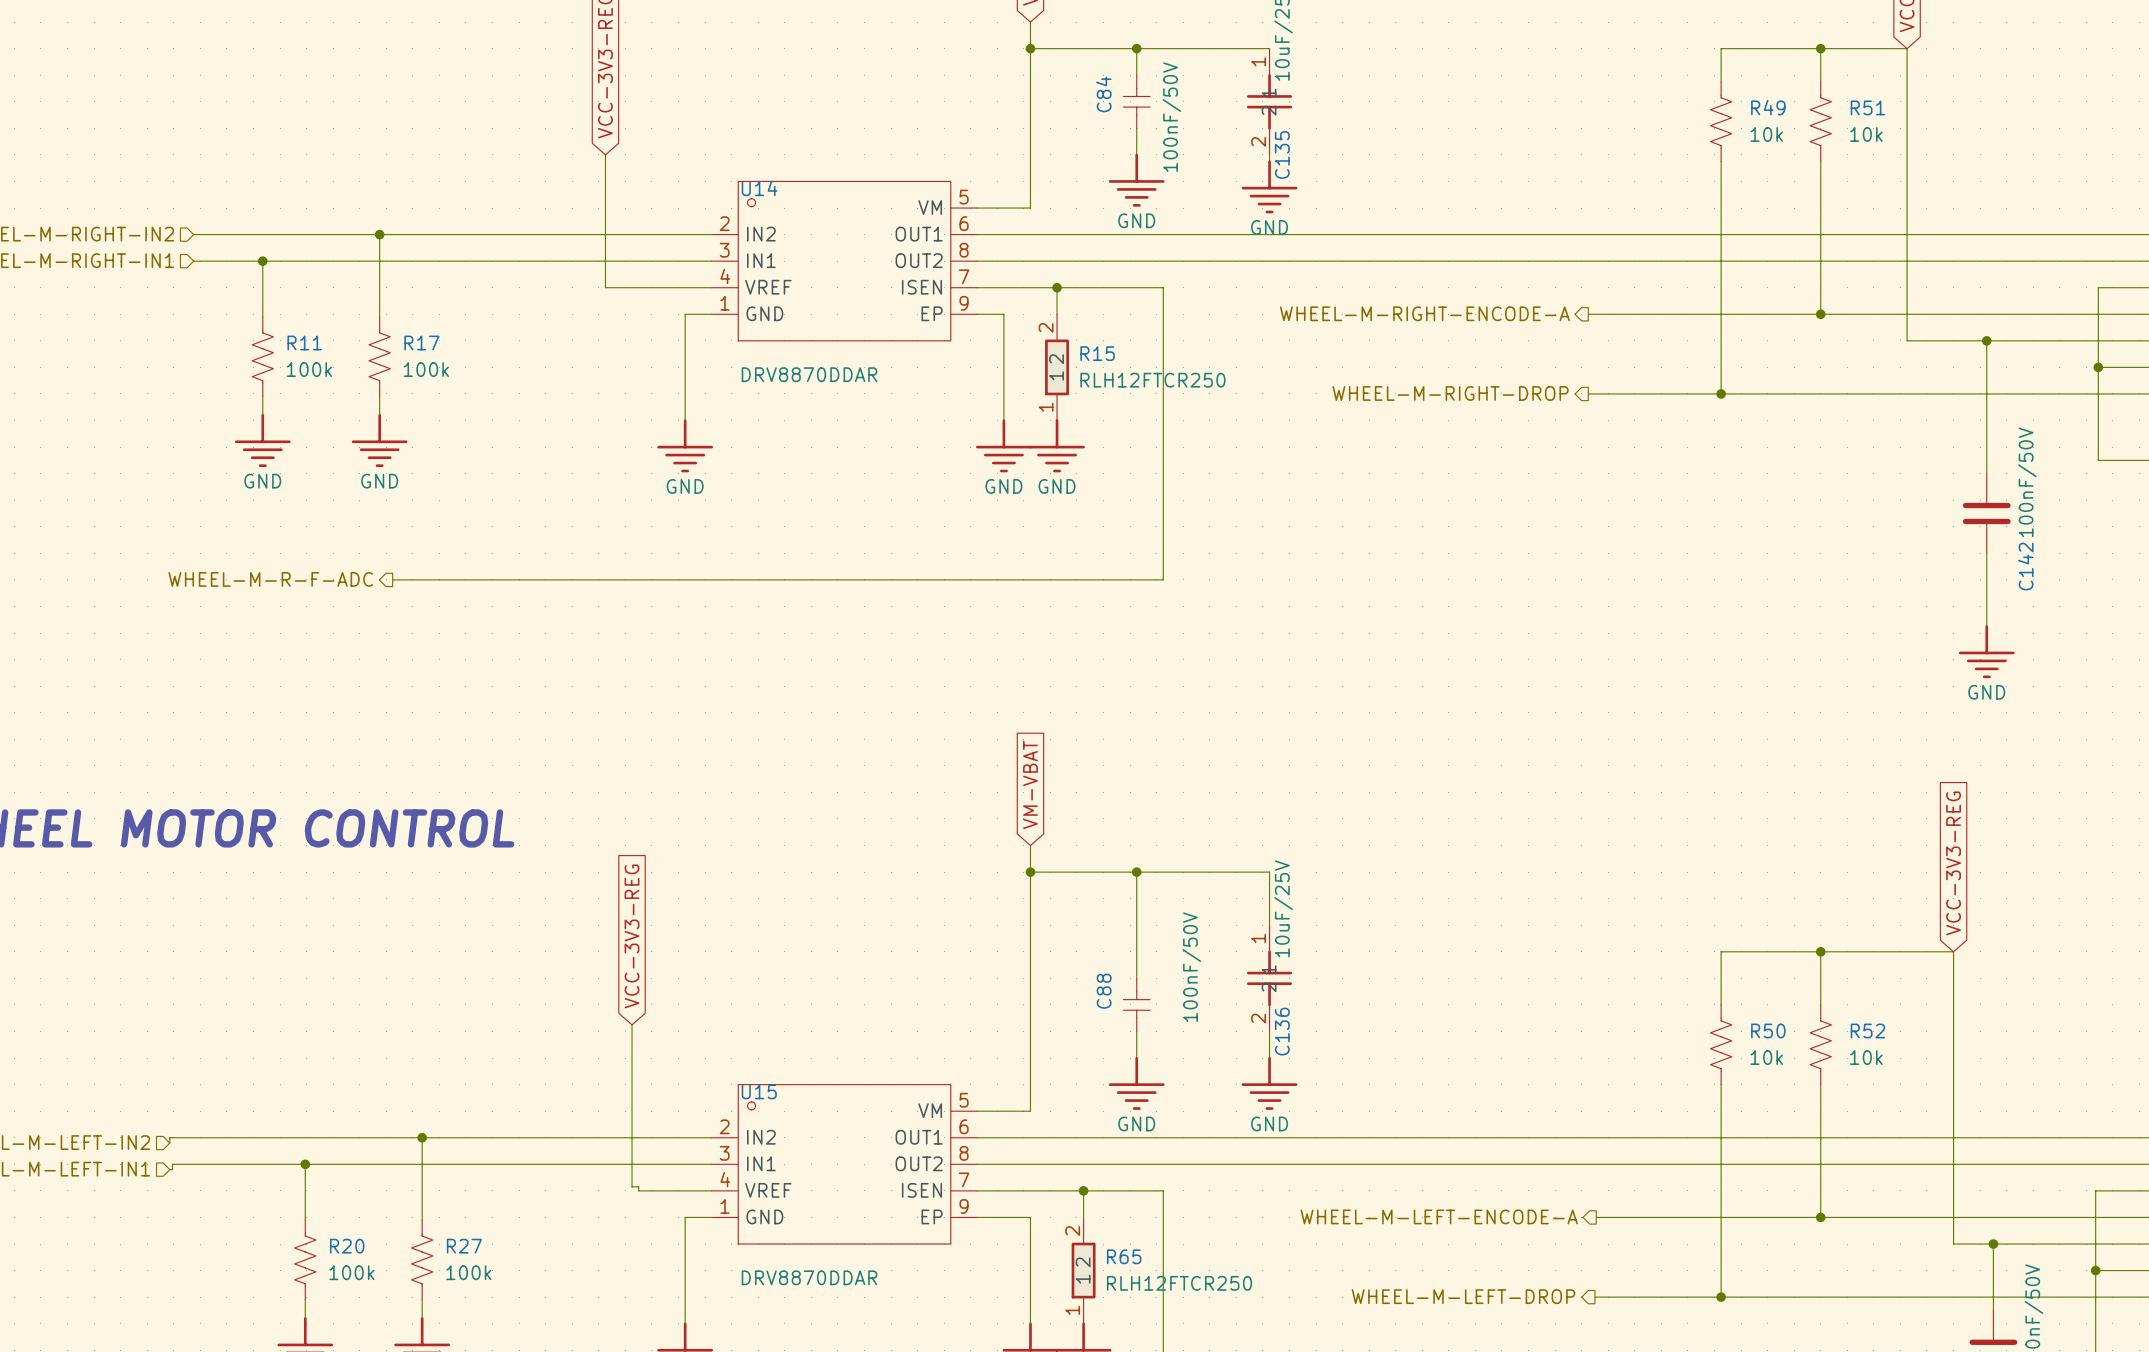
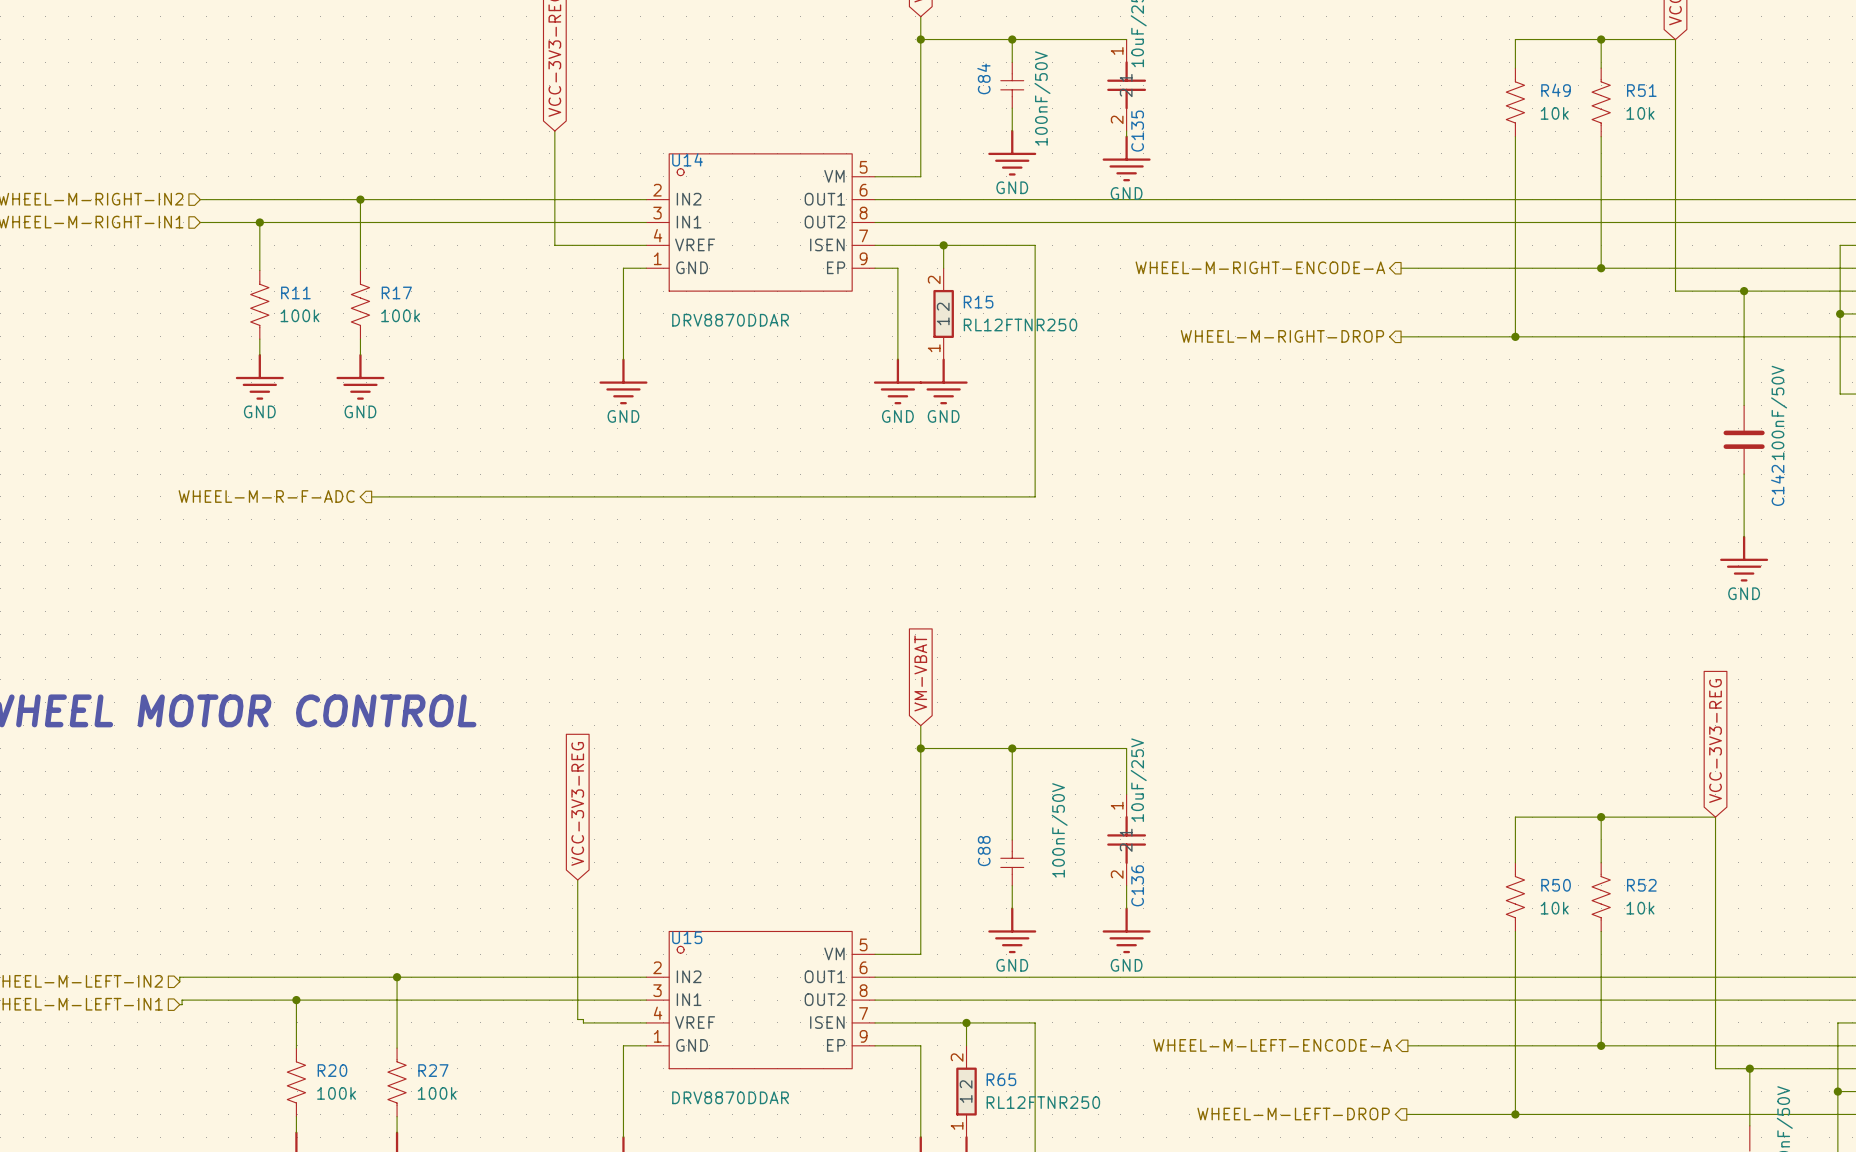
R15 value: RLH12FTCR250 (1152, 380) -> RL12FTNR250 (1020, 324)
R65 value: RLH12FTCR250 (1179, 1283) -> RL12FTNR250 (1043, 1102)

